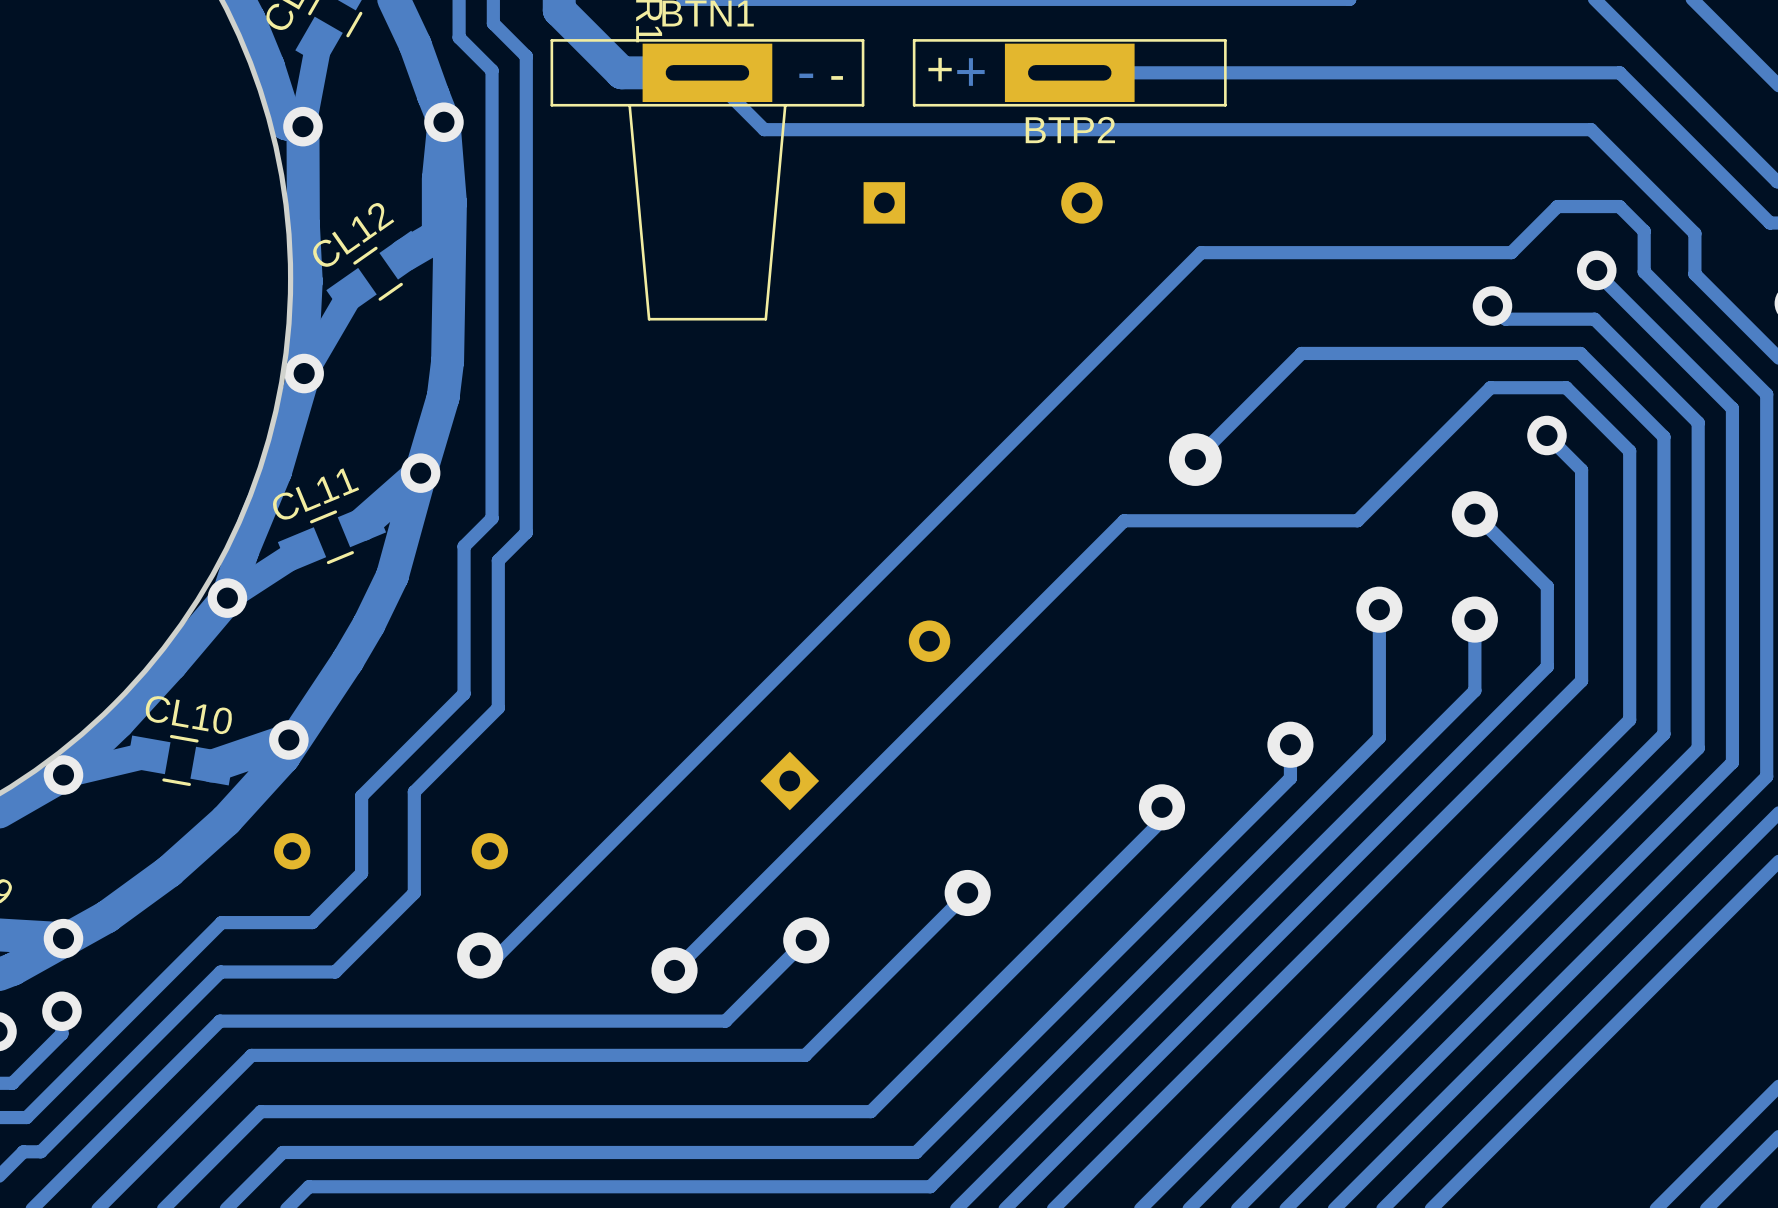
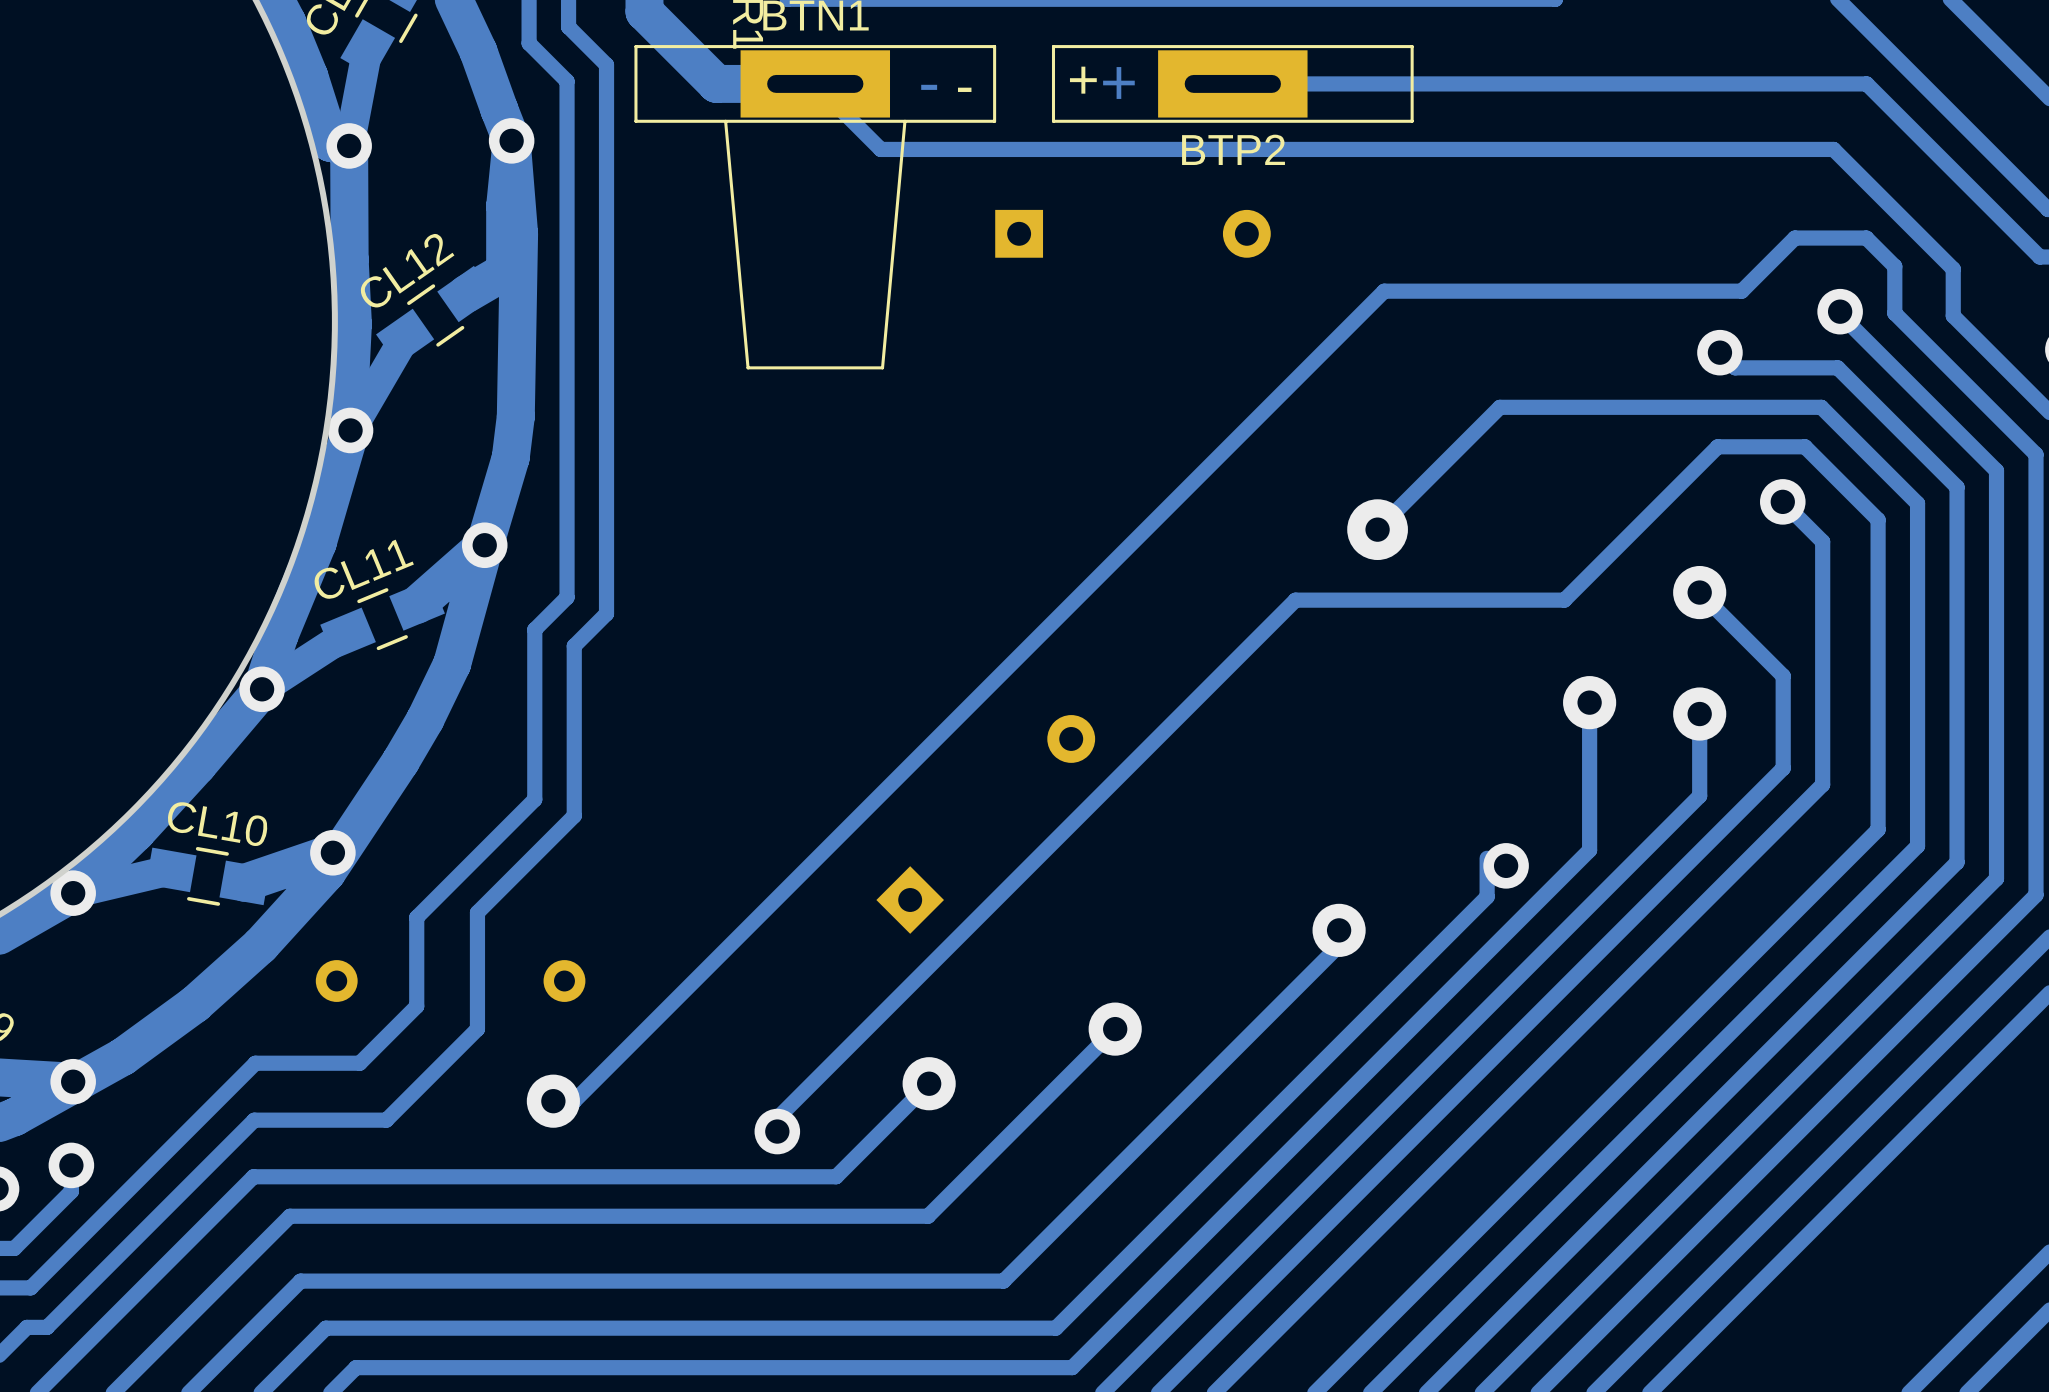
via position: (1290, 744) -> (1506, 865)
via size: [651, 947, 698, 994] -> [754, 1108, 801, 1155]

